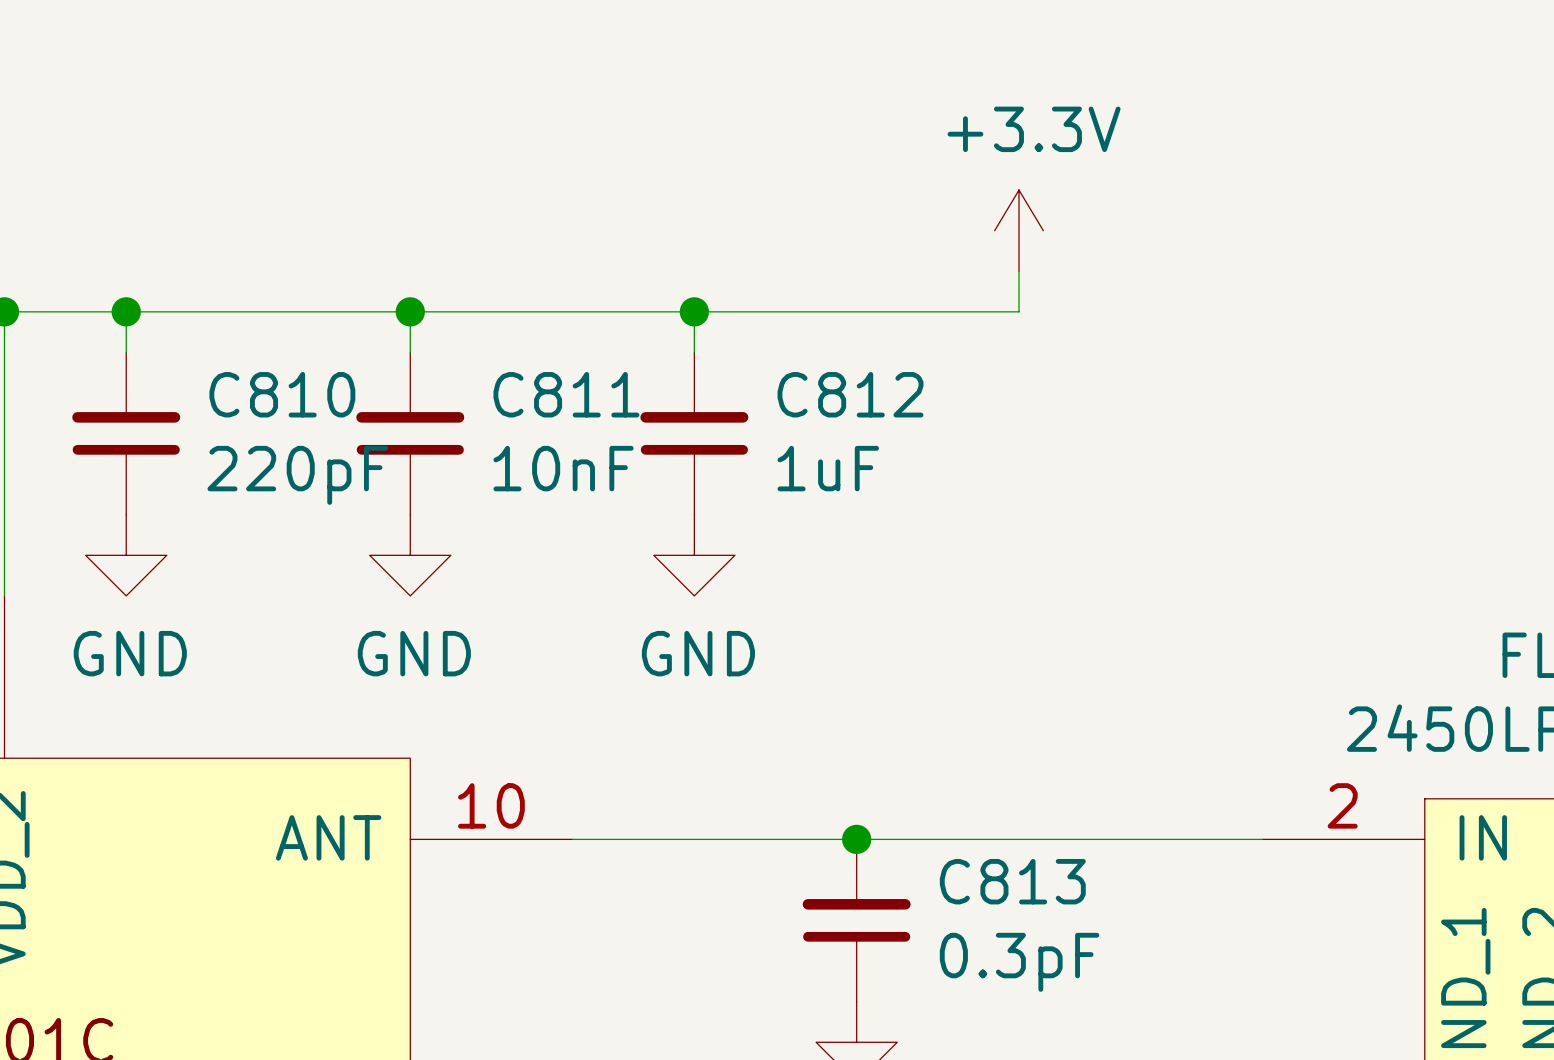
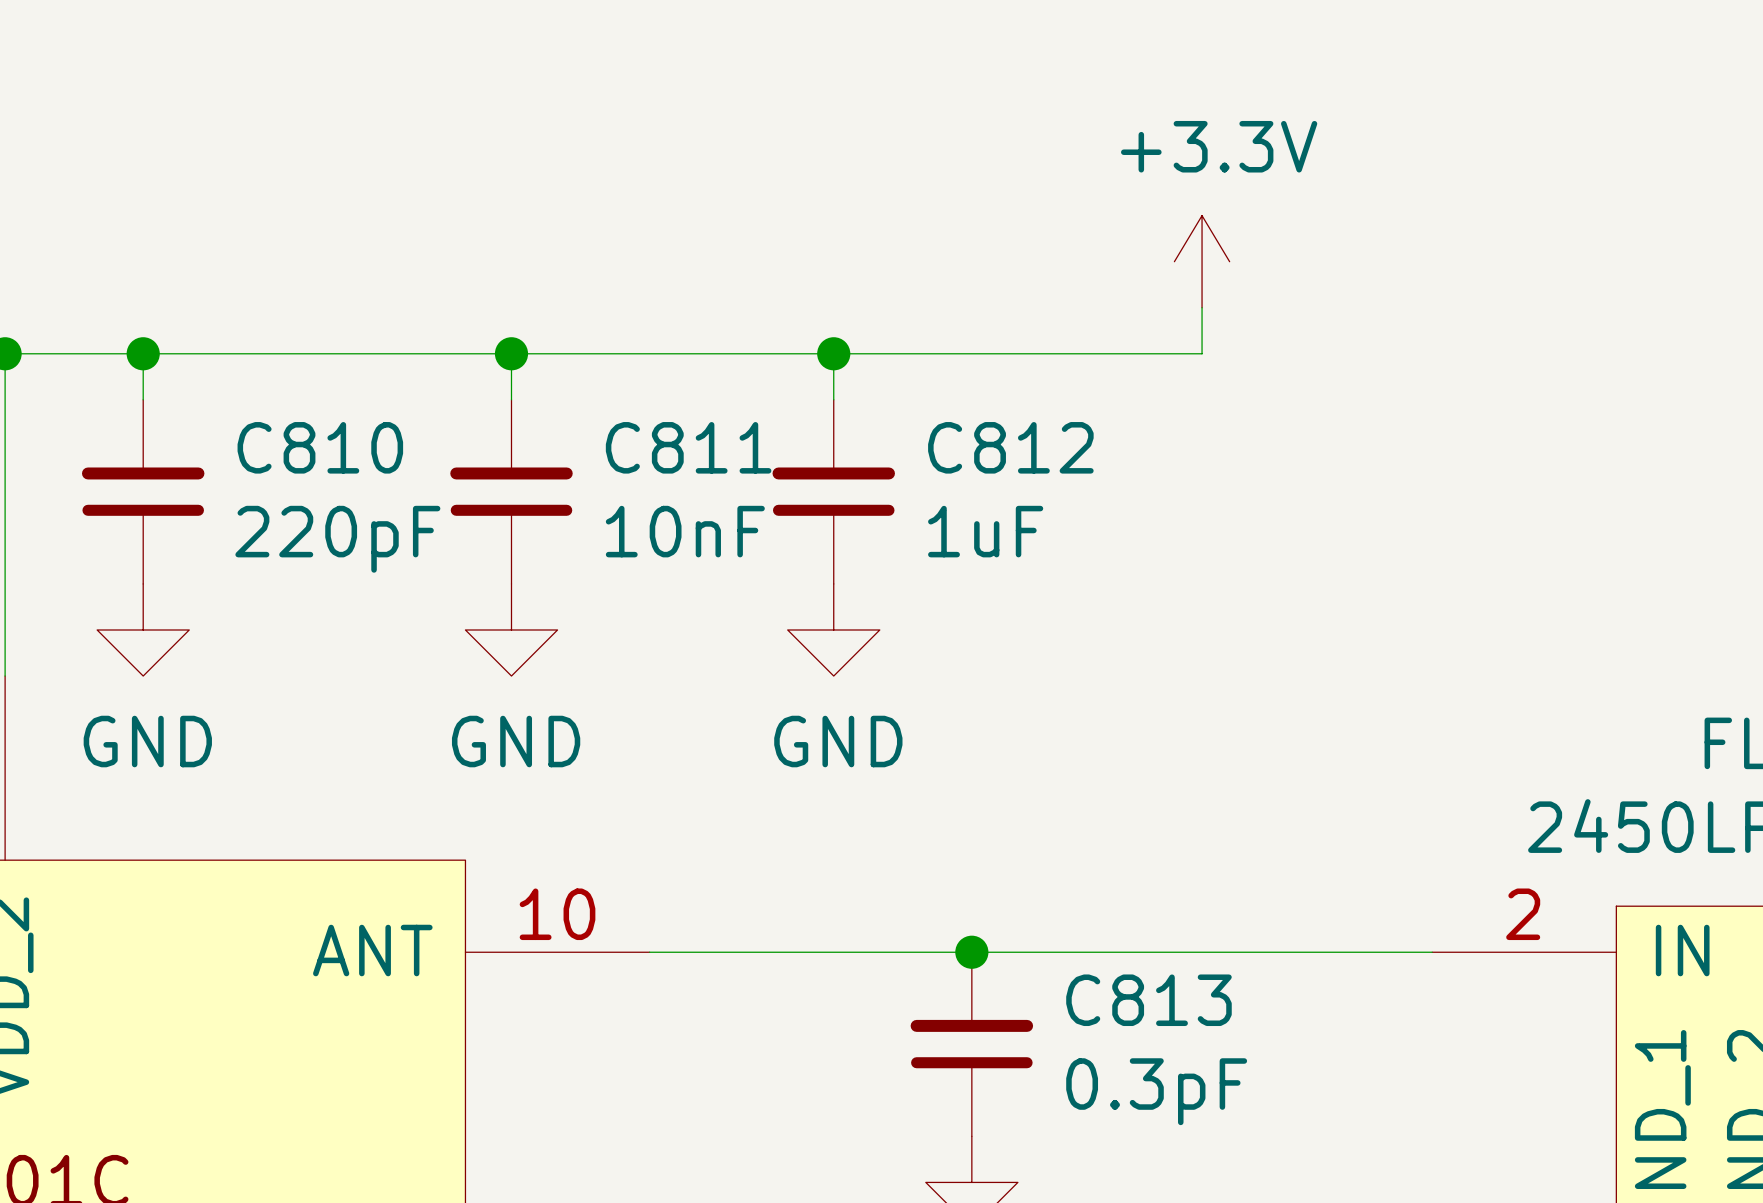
power symbol position: +3.3V (1018, 230) -> +3.3V (1202, 261)
wire: (1018, 271) (1018, 311) -> (1202, 307) (1202, 353) (1155, 353)
wire: (410, 311) (410, 352) -> (511, 353) (511, 399)
junction position: (410, 311) -> (511, 353)
wire: (694, 311) (694, 352) -> (833, 353) (833, 399)
junction position: (694, 311) -> (833, 353)
C811 position: (410, 433) -> (511, 491)
C812 position: (694, 433) -> (833, 491)
power symbol position: GND (410, 555) -> GND (511, 629)
power symbol position: GND (694, 555) -> GND (833, 629)

